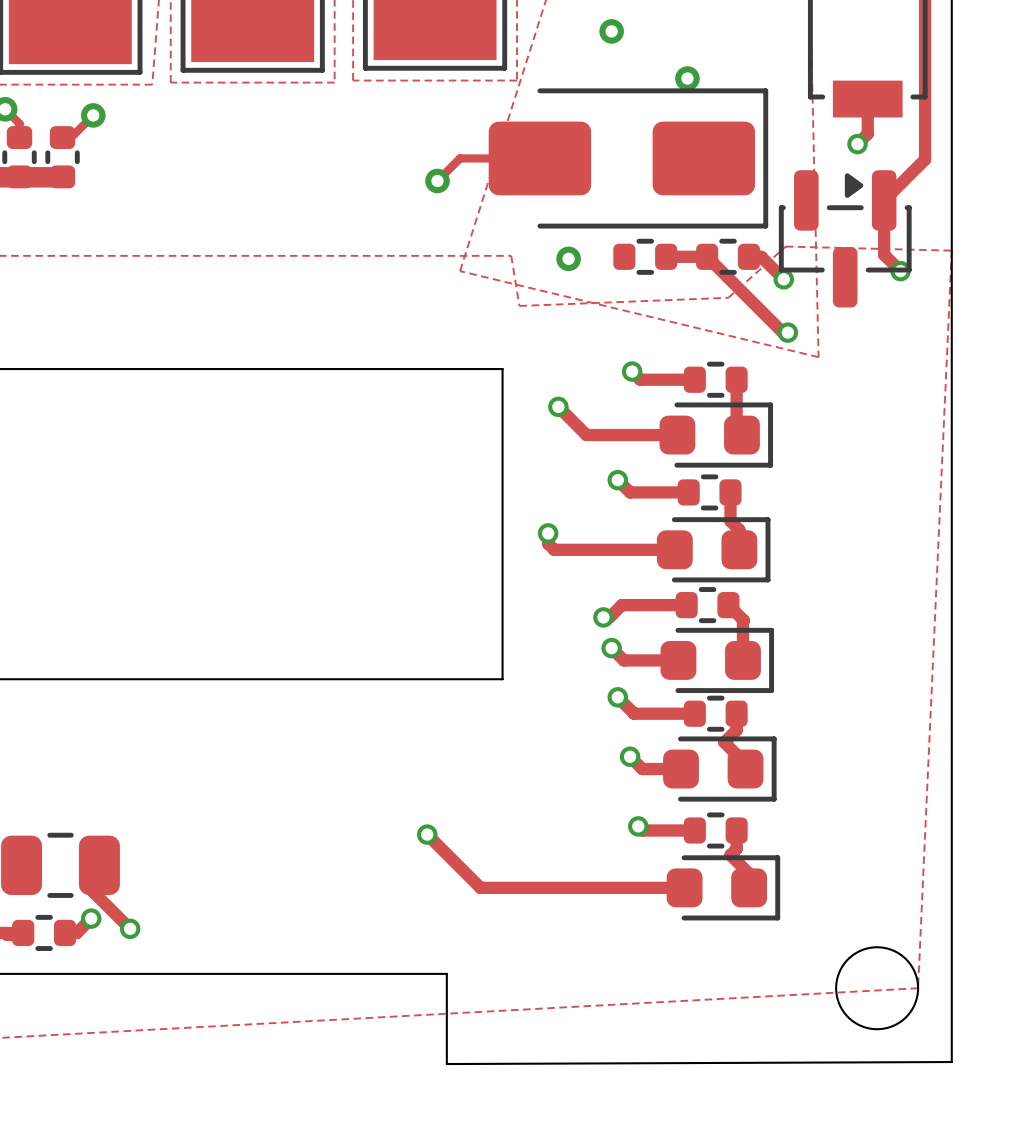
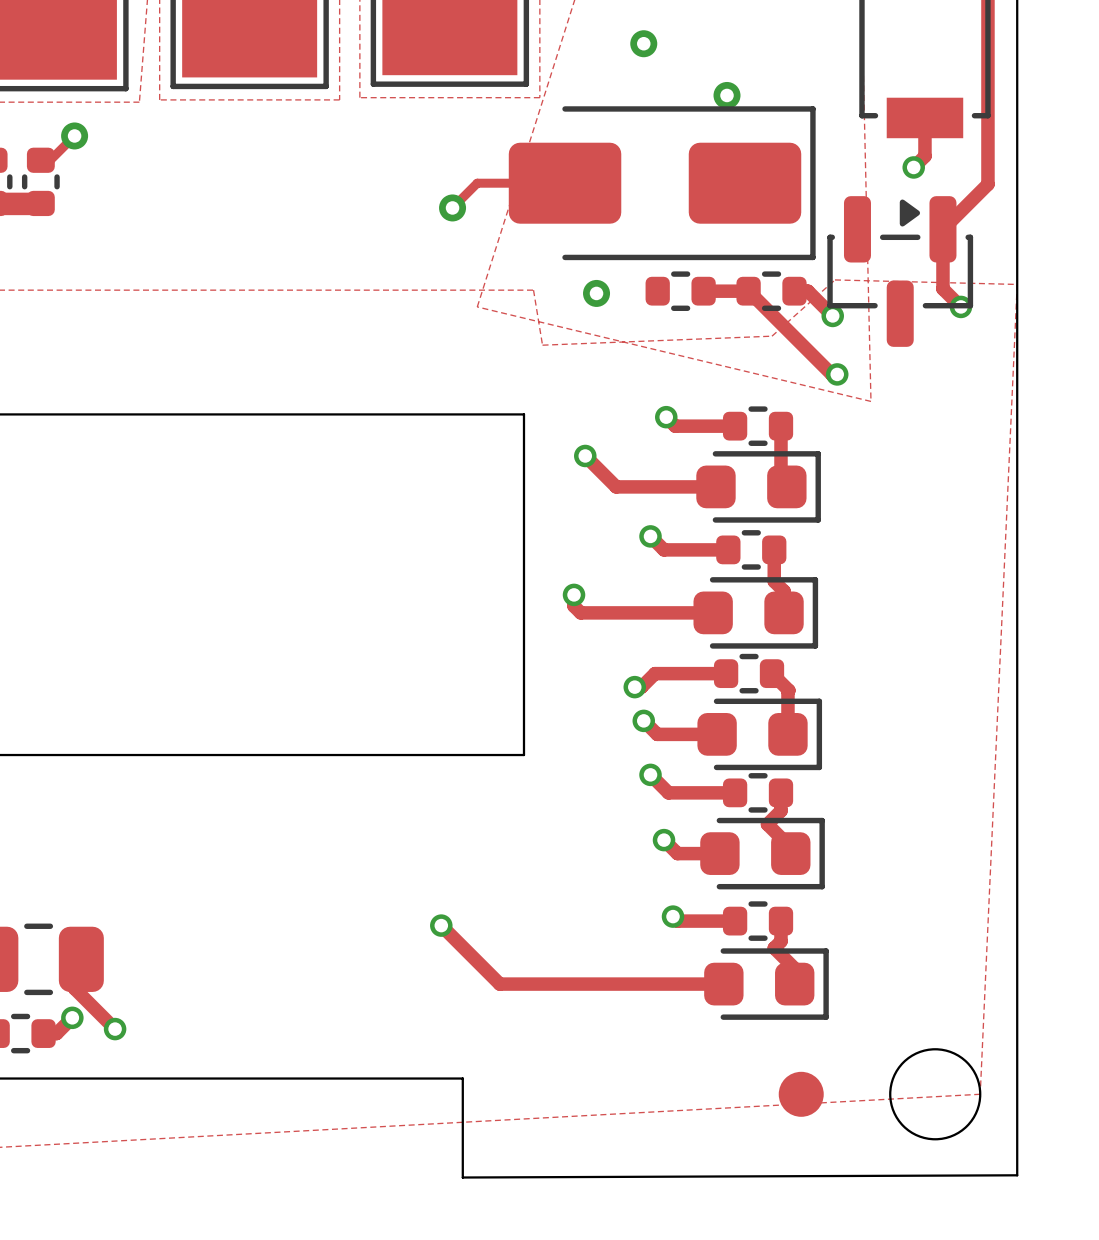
part: none -> (801, 1094)

